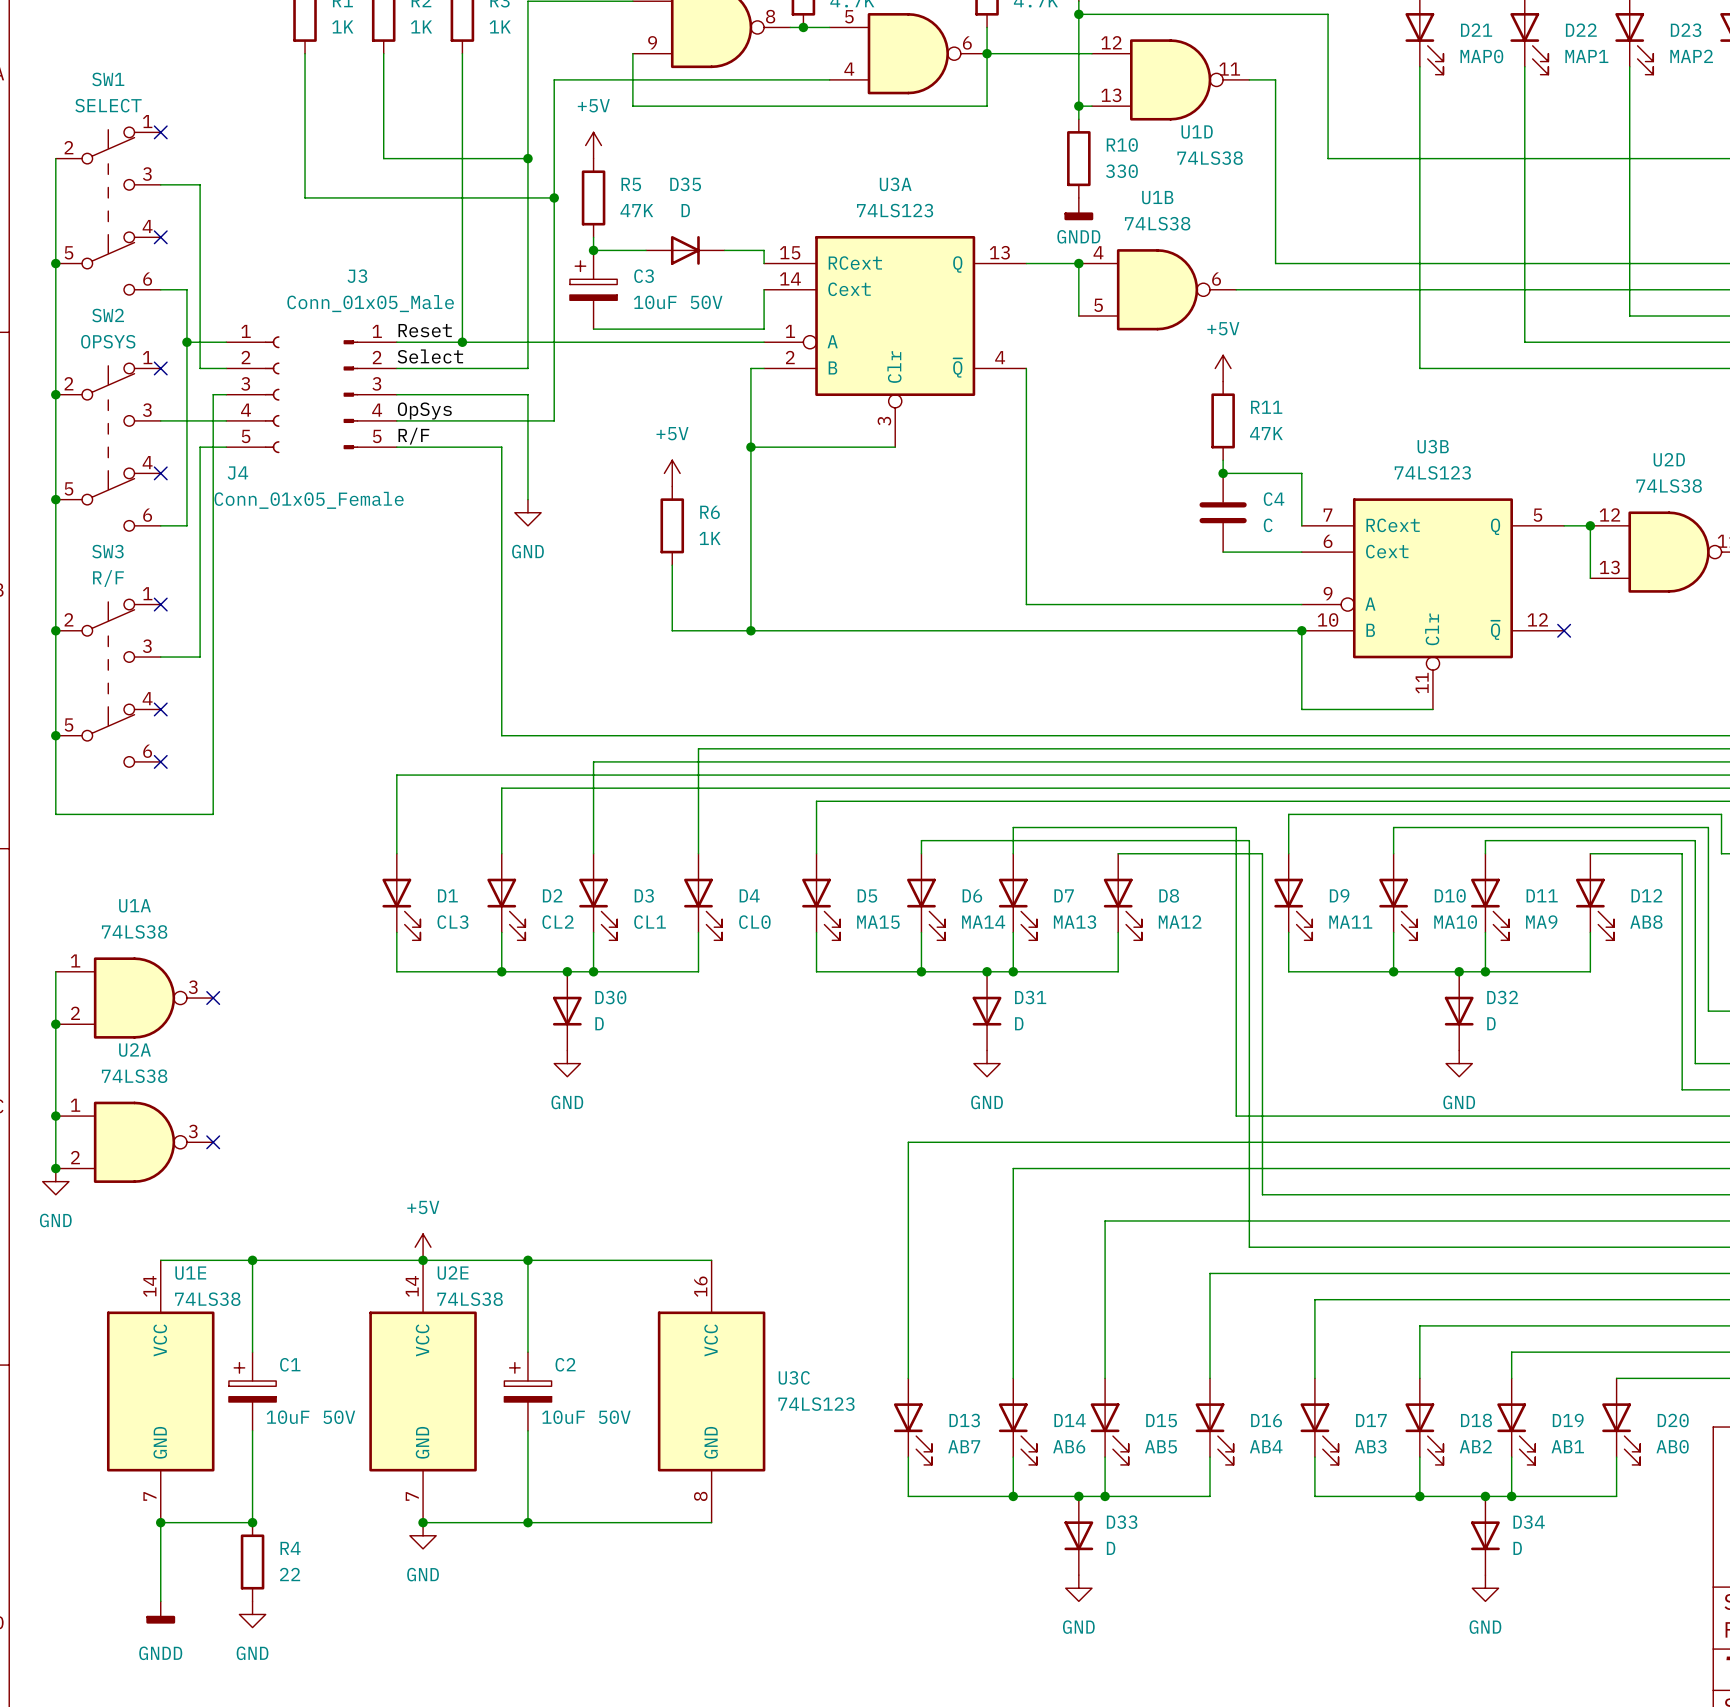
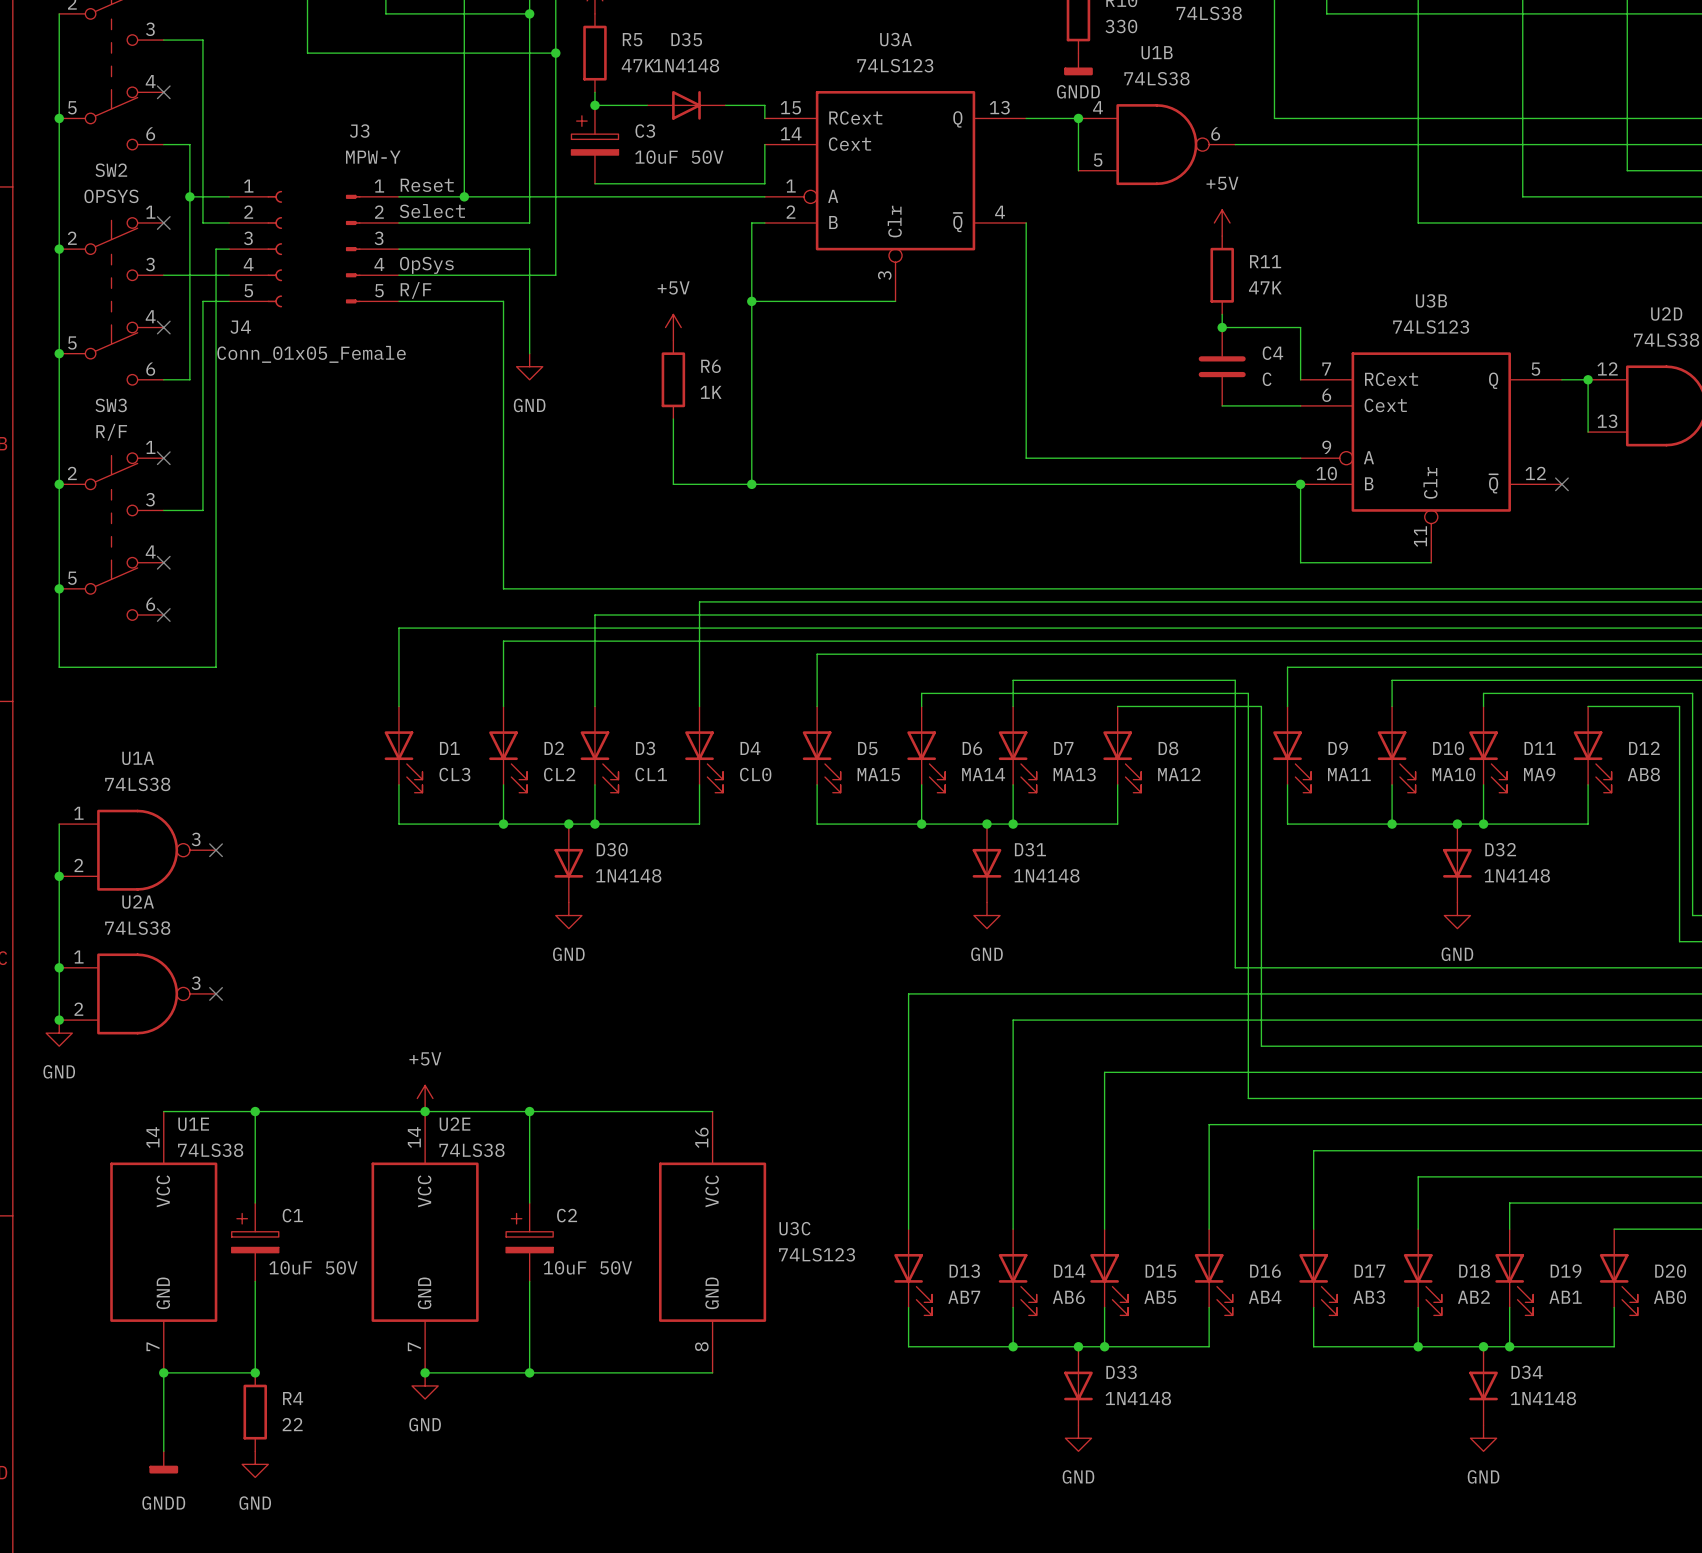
D35 value: D (685, 210) -> 1N4148 (686, 65)
J3 value: Conn_01x05_Male (370, 303) -> MPW-Y (373, 157)
D30 value: D (599, 1023) -> 1N4148 (628, 875)
D31 value: D (1019, 1023) -> 1N4148 (1046, 875)
D32 value: D (1491, 1023) -> 1N4148 (1517, 875)
D33 value: D (1111, 1548) -> 1N4148 (1138, 1398)
D34 value: D (1517, 1548) -> 1N4148 (1543, 1398)

